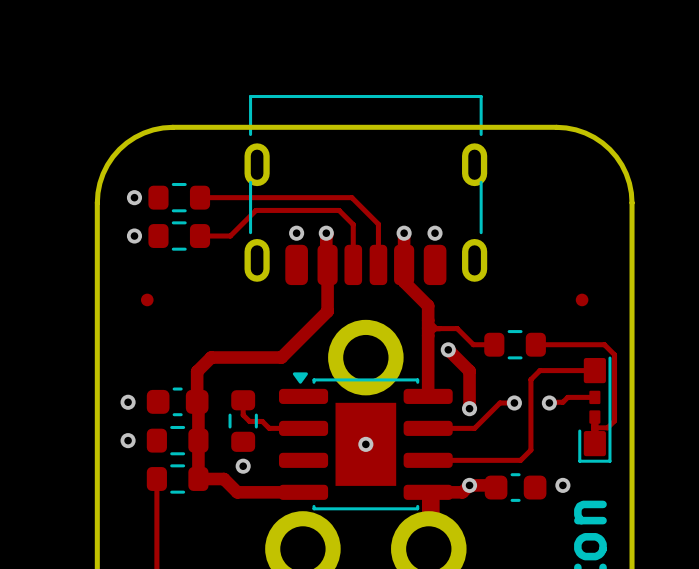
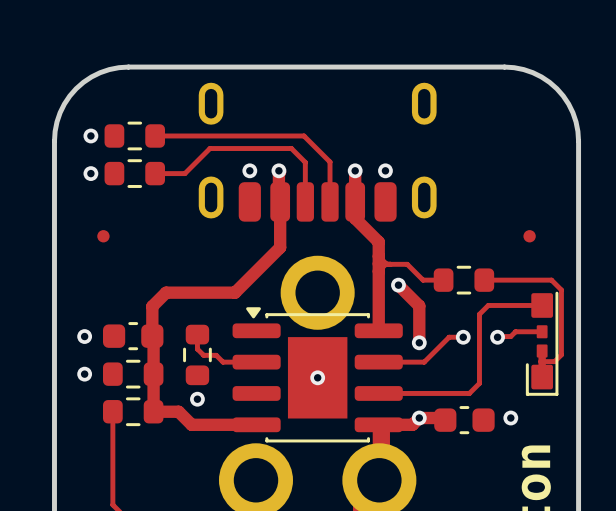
part footprint: [244, 94, 488, 286] -> [198, 82, 437, 222]

